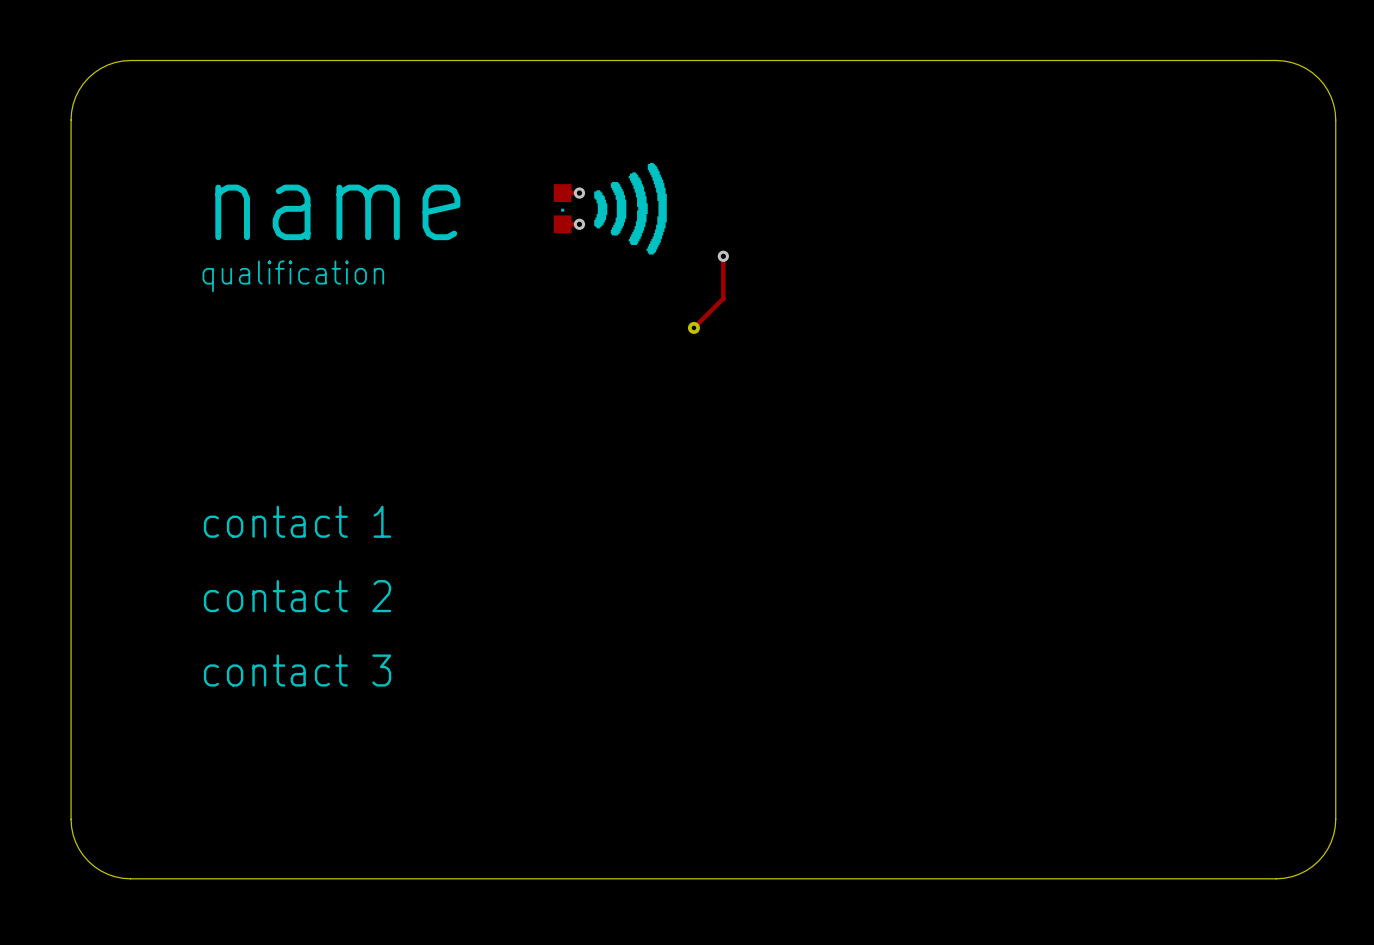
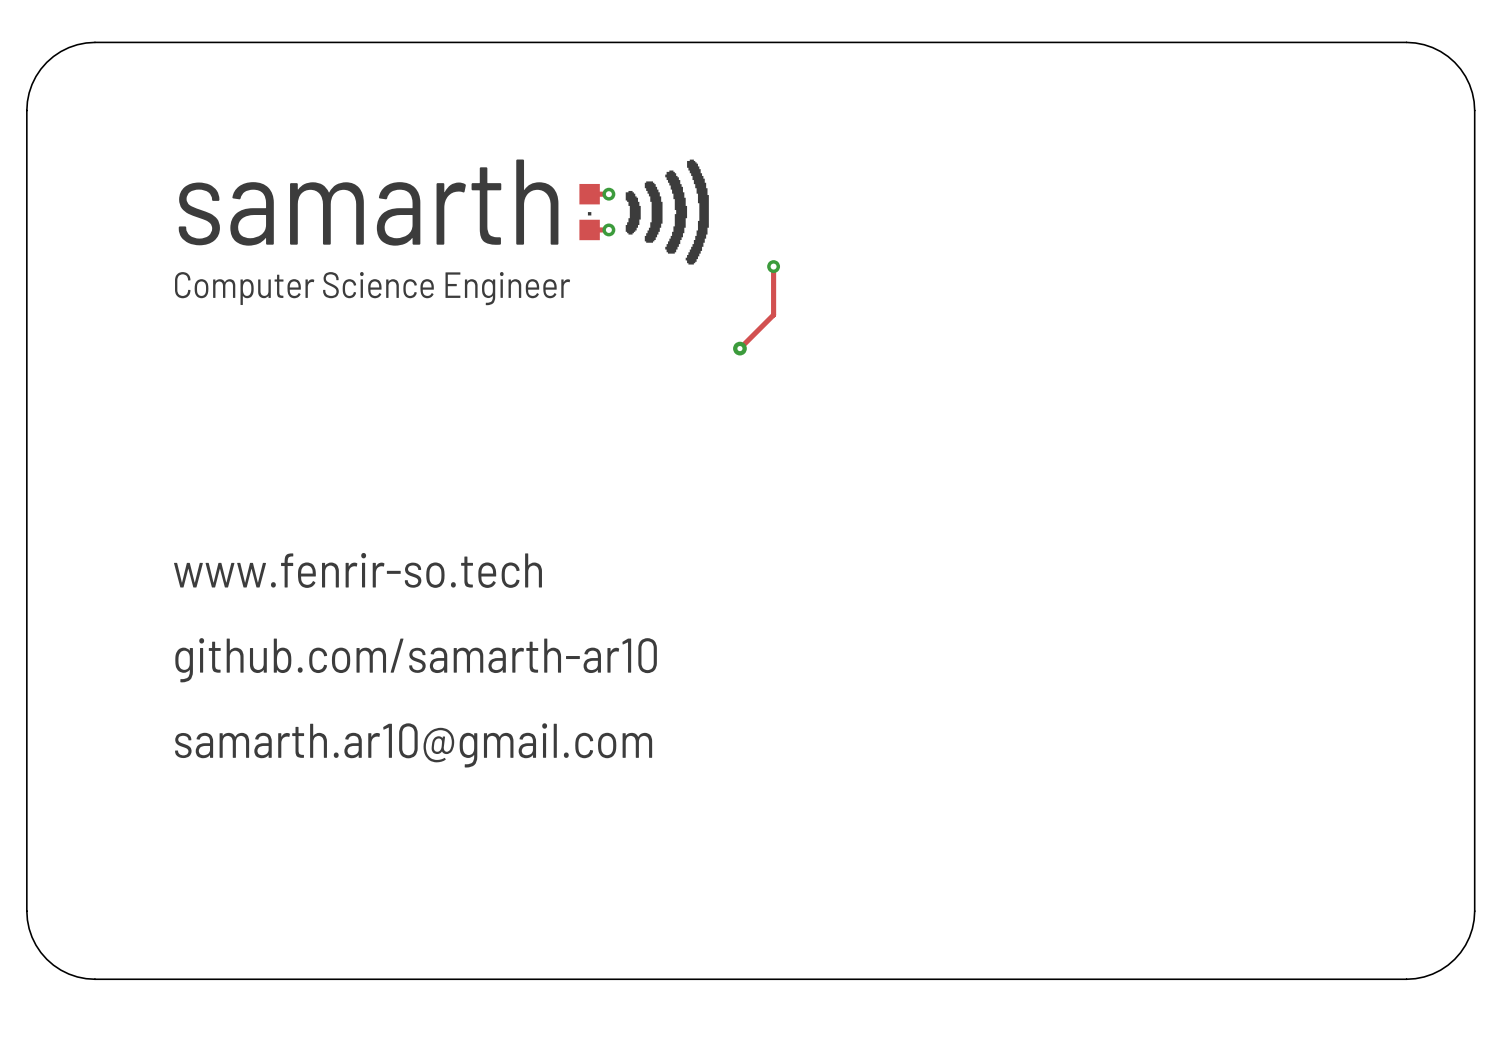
text: name (337, 212) -> samarth (368, 202)
text: qualification (293, 276) -> Computer Science Engineer (372, 288)
text: contact 1 (297, 521) -> www.fenrir-so.tech (357, 570)
text: contact 2 (297, 596) -> github.com/samarth-ar10 (416, 660)
text: contact 3 (297, 670) -> samarth.ar10@gmail.com (413, 745)

